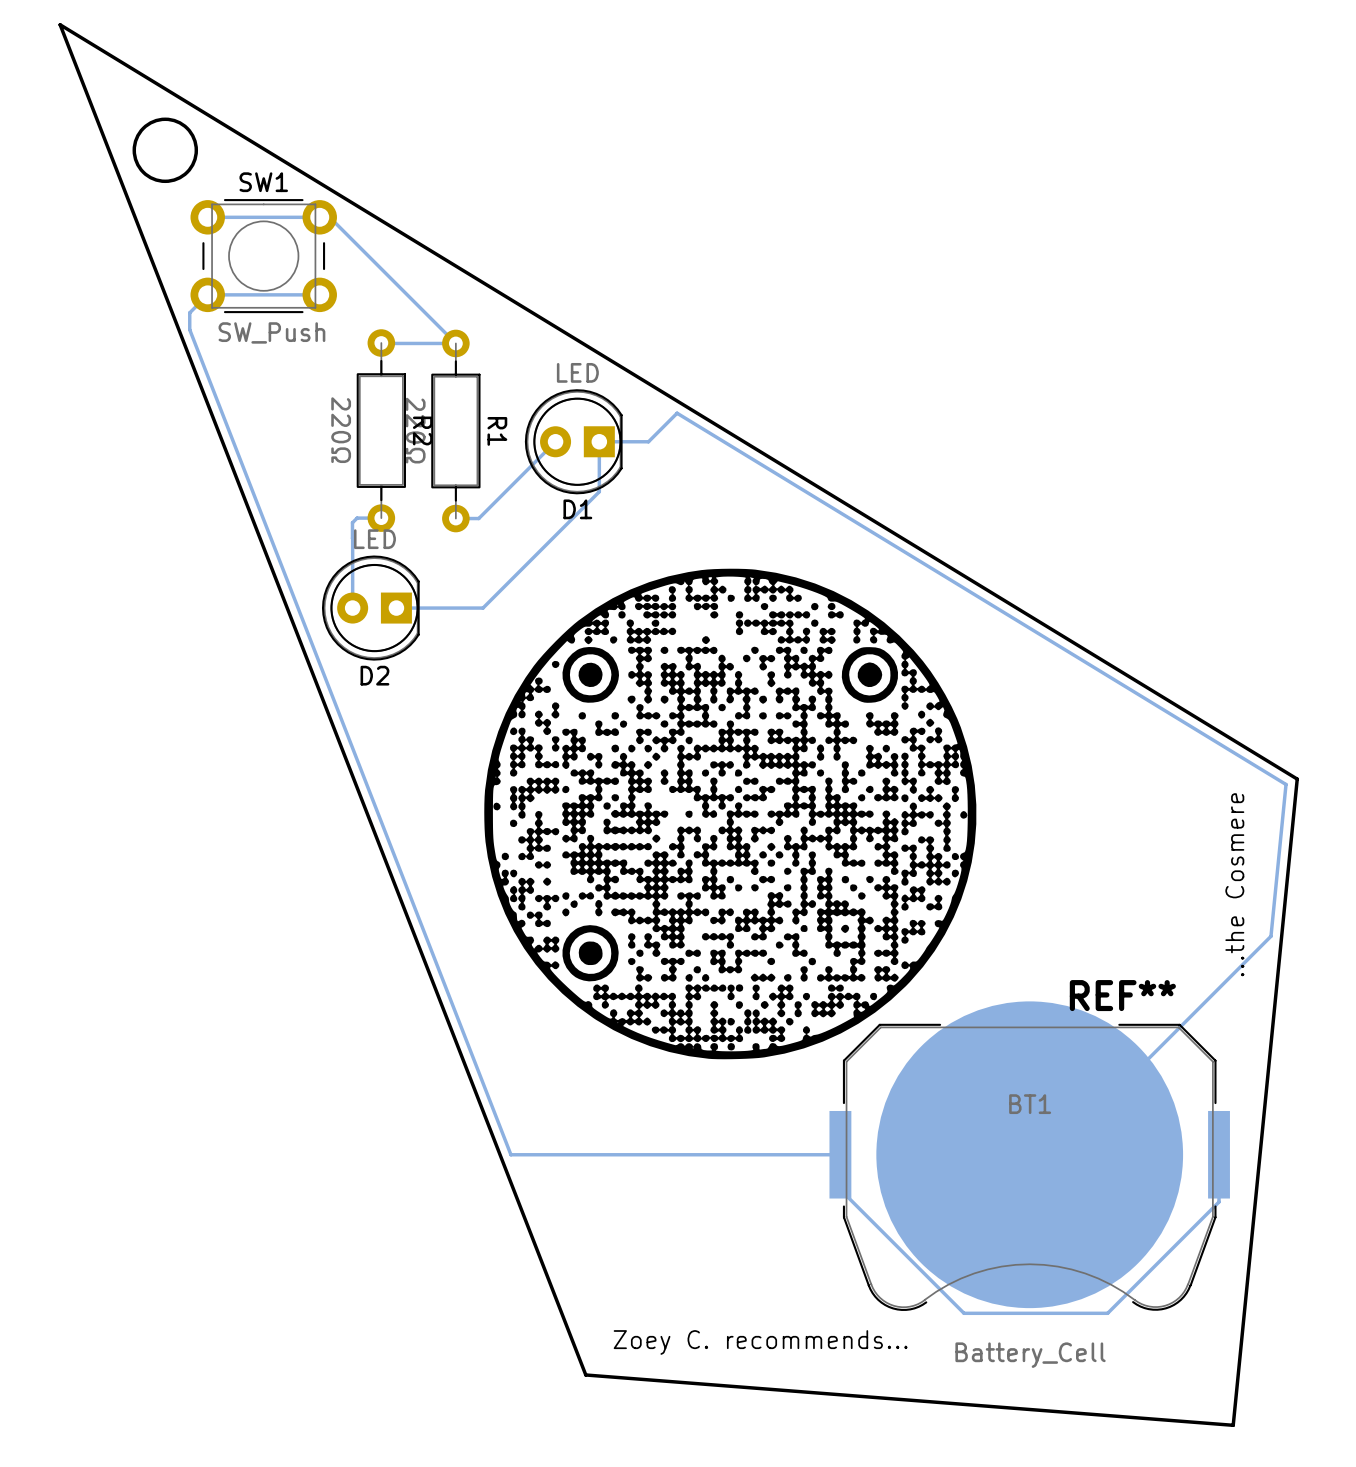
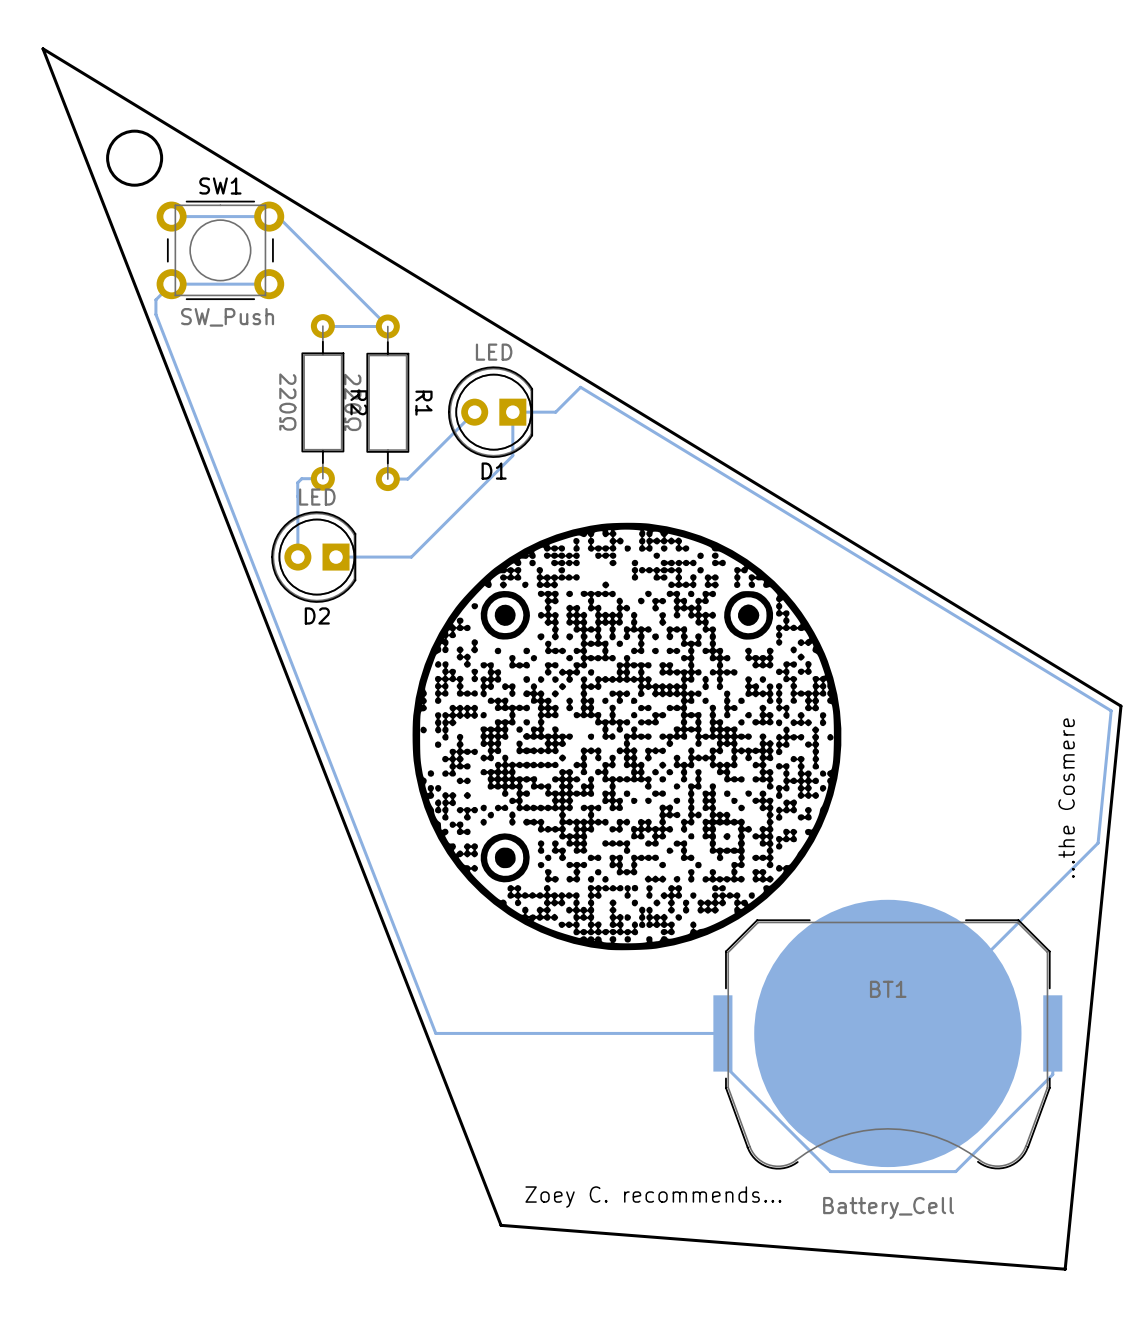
REF**: (730, 813) -> none

